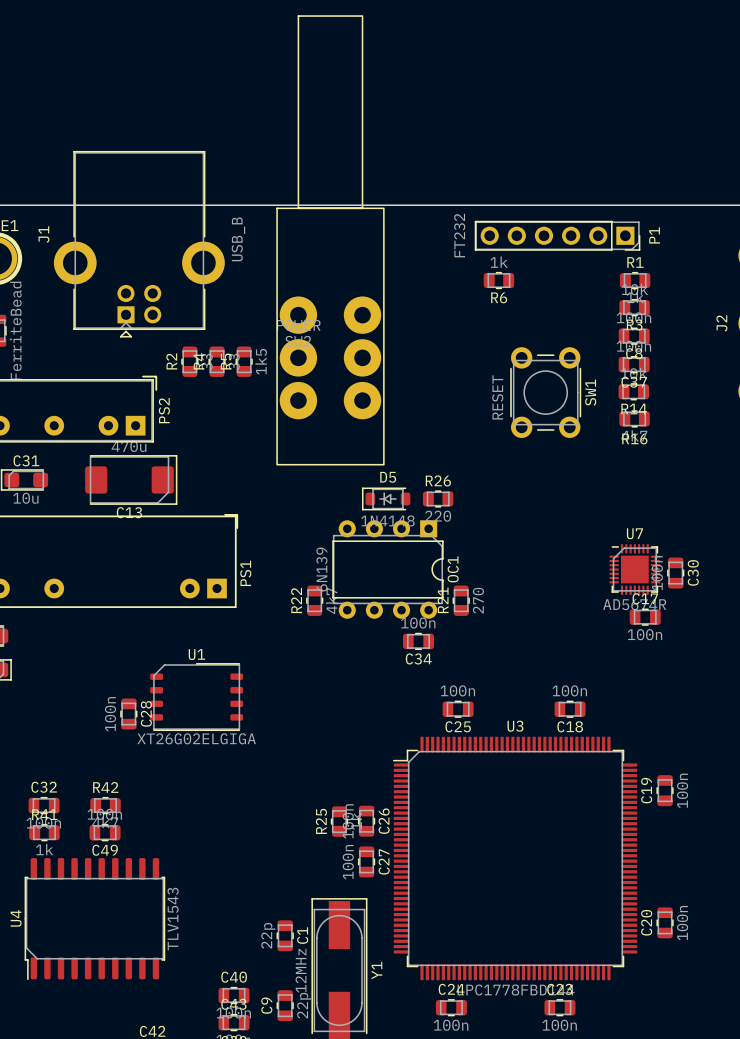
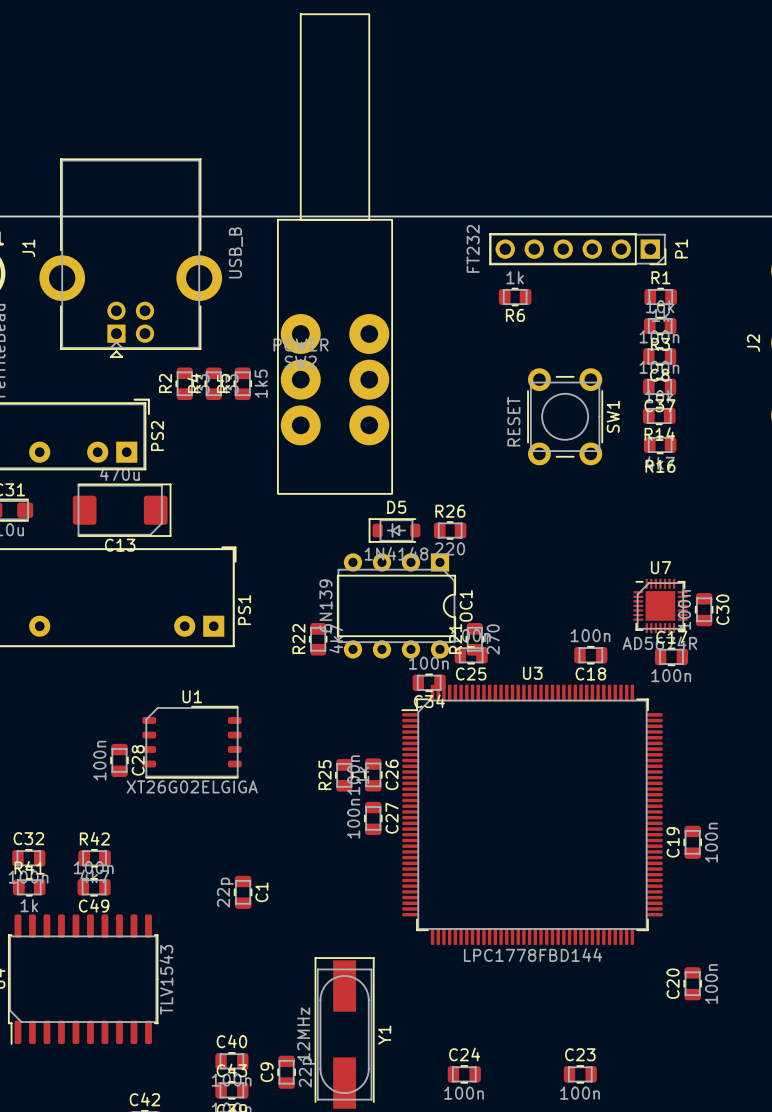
C25 position: (458, 709) -> (471, 655)
C18 position: (570, 709) -> (590, 655)
R25 position: (339, 821) -> (344, 775)
C26 position: (366, 821) -> (373, 774)
U3 position: (515, 858) -> (532, 814)
C27 position: (366, 861) -> (373, 818)
C1 position: (285, 935) -> (243, 892)

